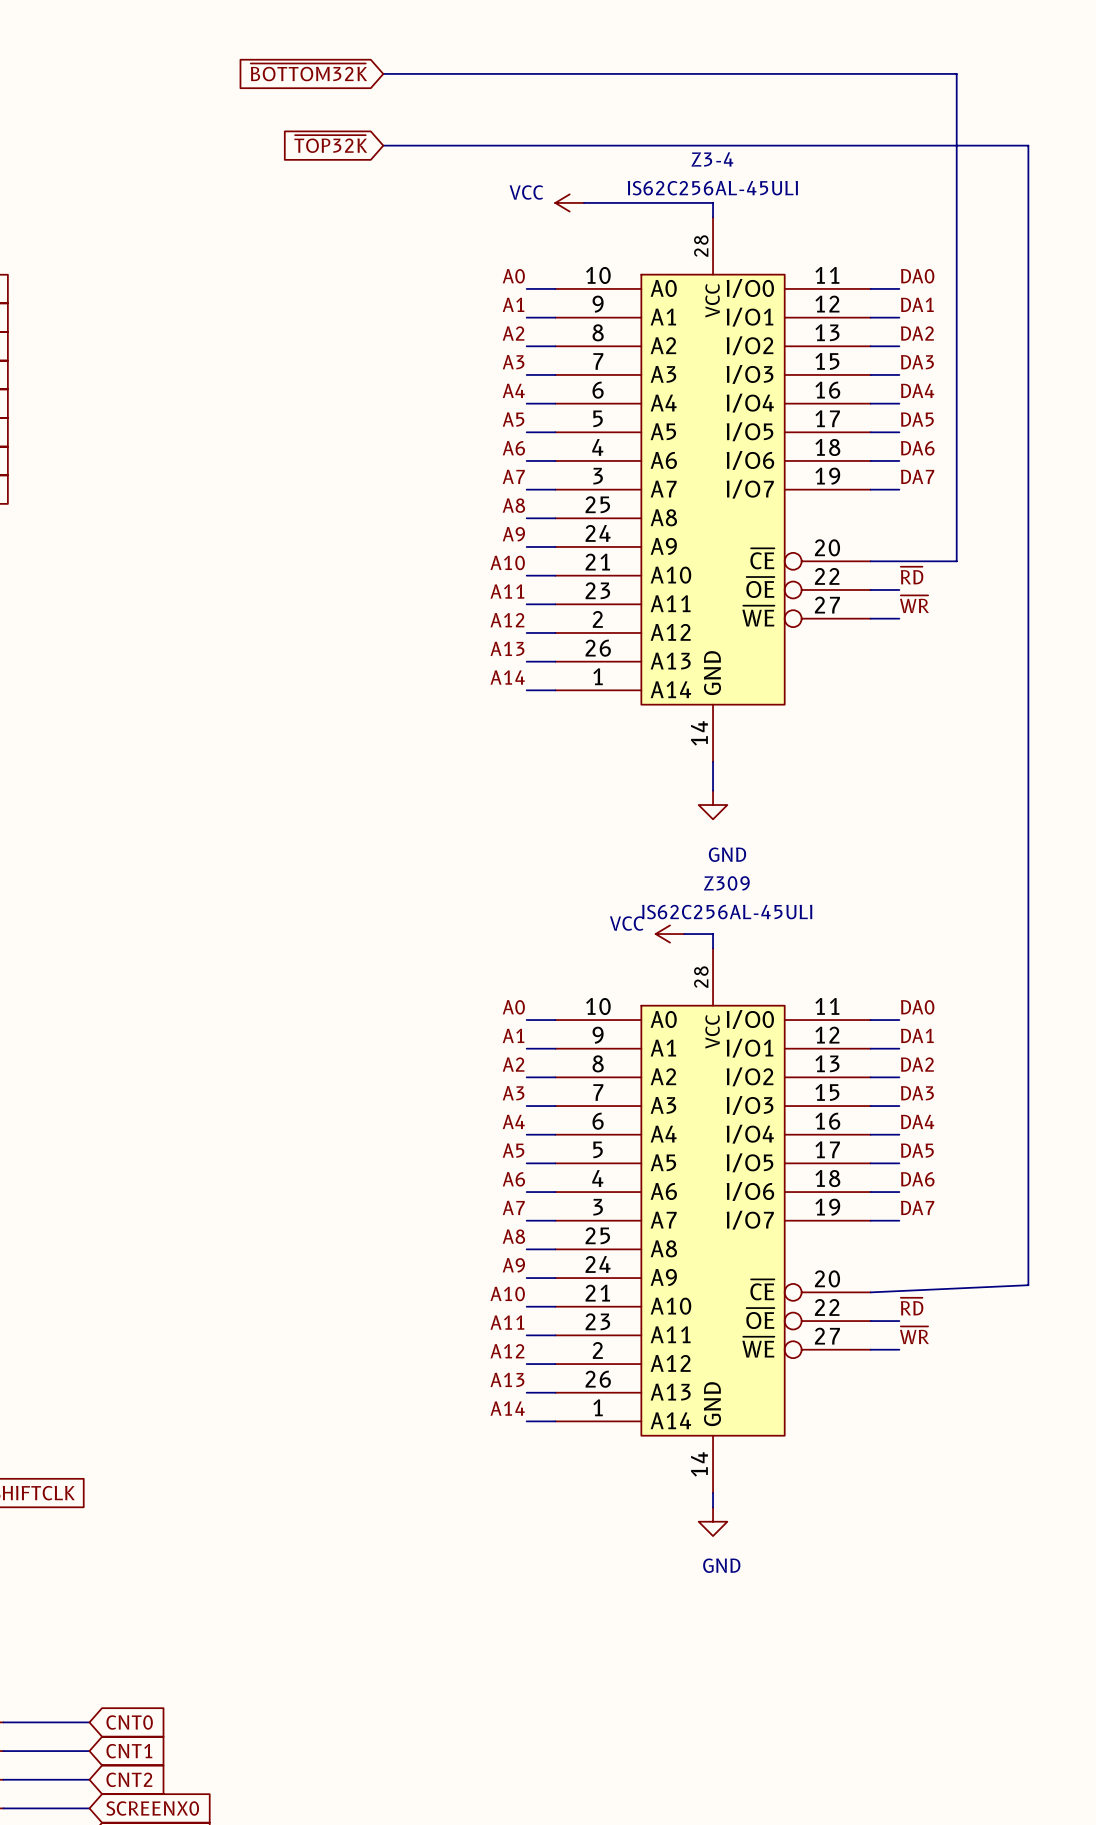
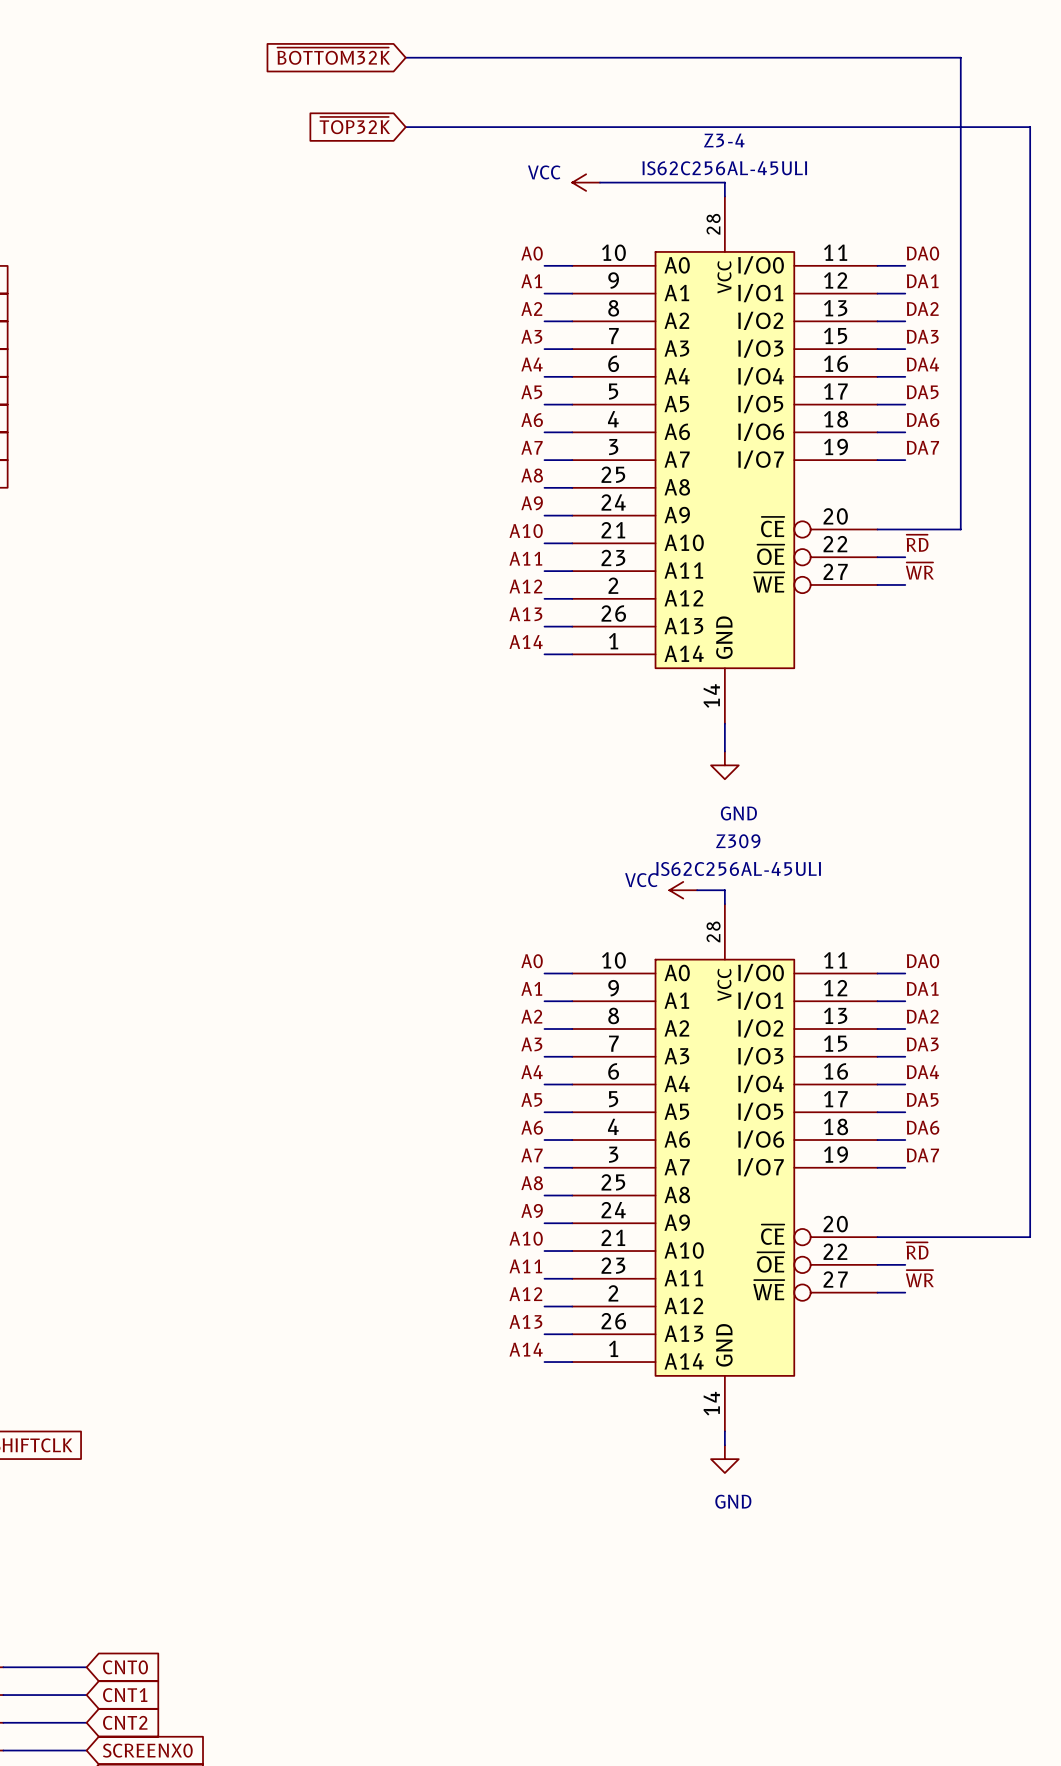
global label position: ~{BOTTOM32K} (308, 72) -> ~{BOTTOM32K} (333, 56)
wire: (383, 73) (956, 73) (956, 561) (870, 561) -> (405, 57) (960, 57) (960, 529) (877, 529)
wire: none -> (405, 127) (1030, 127) (1030, 1237) (877, 1237)
global label position: ~{TOP32K} (330, 144) -> ~{TOP32K} (354, 125)
wire: (383, 145) (1028, 145) (1028, 1285) (870, 1292) -> none
power symbol position: VCC (569, 202) -> VCC (586, 182)
wire: (584, 202) (713, 202) (713, 217) -> (600, 182) (724, 182) (724, 196)
label position: A0 (513, 276) -> A0 (532, 253)
label position: DA0 (917, 276) -> DA0 (922, 253)
wire: (526, 288) (555, 288) -> (544, 265) (572, 265)
wire: (870, 288) (899, 288) -> (877, 265) (905, 265)
label position: A1 (513, 304) -> A1 (531, 281)
label position: DA1 (917, 304) -> DA1 (922, 281)
wire: (526, 317) (555, 317) -> (544, 293) (572, 293)
wire: (870, 317) (899, 317) -> (877, 293) (905, 293)
label position: A2 (513, 333) -> A2 (531, 308)
label position: DA2 (917, 333) -> DA2 (922, 308)
wire: (526, 346) (555, 346) -> (544, 321) (572, 321)
wire: (870, 346) (899, 346) -> (877, 321) (905, 321)
label position: A3 (513, 362) -> A3 (531, 336)
label position: DA3 (917, 362) -> DA3 (922, 336)
wire: (526, 374) (555, 374) -> (544, 349) (572, 349)
wire: (870, 374) (899, 374) -> (877, 349) (905, 349)
label position: A4 (513, 390) -> A4 (532, 364)
label position: DA4 (917, 390) -> DA4 (922, 364)
wire: (526, 403) (555, 403) -> (544, 376) (572, 376)
wire: (870, 403) (899, 403) -> (877, 376) (905, 376)
label position: A5 (513, 419) -> A5 (531, 392)
label position: DA5 (917, 419) -> DA5 (922, 392)
wire: (526, 432) (555, 432) -> (544, 404) (572, 404)
wire: (870, 432) (899, 432) -> (877, 404) (905, 404)
label position: A6 (513, 448) -> A6 (532, 420)
label position: DA6 (917, 448) -> DA6 (923, 420)
wire: (526, 460) (555, 460) -> (544, 432) (572, 432)
wire: (870, 460) (899, 460) -> (877, 432) (905, 432)
label position: A7 (513, 476) -> A7 (532, 447)
label position: DA7 (917, 476) -> DA7 (922, 447)
wire: (526, 489) (555, 489) -> (544, 460) (572, 460)
Z3-4 position: (713, 489) -> (724, 460)
wire: (870, 489) (899, 489) -> (877, 460) (905, 460)
label position: A8 (513, 505) -> A8 (532, 475)
wire: (526, 518) (555, 518) -> (544, 487) (572, 487)
label position: A9 (513, 534) -> A9 (532, 503)
wire: (526, 546) (555, 546) -> (544, 515) (572, 515)
label position: A10 (507, 562) -> A10 (526, 531)
wire: (526, 575) (555, 575) -> (544, 543) (572, 543)
label position: ~{RD} (912, 575) -> ~{RD} (917, 543)
wire: (870, 589) (899, 589) -> (877, 557) (905, 557)
label position: A11 (507, 591) -> A11 (525, 558)
wire: (526, 604) (555, 604) -> (544, 571) (572, 571)
label position: ~{WR} (914, 604) -> ~{WR} (919, 571)
wire: (870, 618) (899, 618) -> (877, 584) (905, 584)
label position: A12 (507, 620) -> A12 (525, 586)
wire: (526, 632) (555, 632) -> (544, 598) (572, 598)
label position: A13 (507, 648) -> A13 (525, 614)
wire: (526, 661) (555, 661) -> (544, 626) (572, 626)
label position: A14 (507, 677) -> A14 (526, 641)
wire: (526, 690) (555, 690) -> (544, 654) (572, 654)
wire: (713, 762) (713, 790) -> (724, 723) (724, 751)
power symbol position: GND (713, 805) -> GND (724, 765)
power symbol position: VCC (670, 934) -> VCC (683, 890)
wire: (684, 934) (713, 934) (713, 948) -> (697, 890) (724, 890) (724, 904)
label position: A0 (513, 1007) -> A0 (532, 961)
label position: DA0 (917, 1007) -> DA0 (922, 961)
wire: (526, 1020) (555, 1020) -> (544, 973) (572, 973)
wire: (870, 1020) (899, 1020) -> (877, 973) (905, 973)
label position: A1 (513, 1035) -> A1 (531, 988)
label position: DA1 (917, 1035) -> DA1 (922, 988)
wire: (526, 1048) (555, 1048) -> (544, 1001) (572, 1001)
wire: (870, 1048) (899, 1048) -> (877, 1001) (905, 1001)
label position: A2 (513, 1064) -> A2 (531, 1016)
label position: DA2 (917, 1064) -> DA2 (922, 1016)
wire: (526, 1077) (555, 1077) -> (544, 1029) (572, 1029)
wire: (870, 1077) (899, 1077) -> (877, 1029) (905, 1029)
label position: A3 (513, 1093) -> A3 (531, 1044)
label position: DA3 (917, 1093) -> DA3 (922, 1044)
wire: (526, 1106) (555, 1106) -> (544, 1056) (572, 1056)
wire: (870, 1106) (899, 1106) -> (877, 1056) (905, 1056)
label position: A4 (513, 1121) -> A4 (532, 1072)
label position: DA4 (917, 1121) -> DA4 (922, 1072)
wire: (526, 1134) (555, 1134) -> (544, 1084) (572, 1084)
wire: (870, 1134) (899, 1134) -> (877, 1084) (905, 1084)
label position: A5 (513, 1150) -> A5 (531, 1099)
label position: DA5 (917, 1150) -> DA5 (922, 1099)
wire: (526, 1163) (555, 1163) -> (544, 1112) (572, 1112)
wire: (870, 1163) (899, 1163) -> (877, 1112) (905, 1112)
label position: A6 (513, 1179) -> A6 (532, 1127)
label position: DA6 (917, 1179) -> DA6 (923, 1127)
wire: (526, 1192) (555, 1192) -> (544, 1140) (572, 1140)
wire: (870, 1192) (899, 1192) -> (877, 1140) (905, 1140)
label position: A7 (513, 1207) -> A7 (532, 1155)
label position: DA7 (917, 1207) -> DA7 (922, 1155)
wire: (526, 1220) (555, 1220) -> (544, 1167) (572, 1167)
Z309 position: (713, 1220) -> (724, 1167)
wire: (870, 1220) (899, 1220) -> (877, 1167) (905, 1167)
label position: A8 (513, 1236) -> A8 (532, 1183)
wire: (526, 1249) (555, 1249) -> (544, 1195) (572, 1195)
label position: A9 (513, 1265) -> A9 (532, 1210)
wire: (526, 1278) (555, 1278) -> (544, 1223) (572, 1223)
label position: A10 (507, 1293) -> A10 (526, 1238)
wire: (526, 1306) (555, 1306) -> (544, 1251) (572, 1251)
label position: ~{RD} (912, 1306) -> ~{RD} (917, 1250)
wire: (870, 1321) (899, 1321) -> (877, 1264) (905, 1264)
label position: A11 (507, 1322) -> A11 (525, 1266)
wire: (526, 1335) (555, 1335) -> (544, 1278) (572, 1278)
label position: ~{WR} (914, 1335) -> ~{WR} (919, 1278)
wire: (870, 1349) (899, 1349) -> (877, 1292) (905, 1292)
label position: A12 (507, 1351) -> A12 (525, 1294)
wire: (526, 1364) (555, 1364) -> (544, 1306) (572, 1306)
label position: A13 (507, 1379) -> A13 (525, 1321)
wire: (526, 1392) (555, 1392) -> (544, 1334) (572, 1334)
label position: A14 (507, 1408) -> A14 (526, 1349)
wire: (526, 1421) (555, 1421) -> (544, 1362) (572, 1362)
wire: (713, 1493) (713, 1507) -> (724, 1431) (724, 1445)
power symbol position: GND (713, 1521) -> GND (724, 1459)

